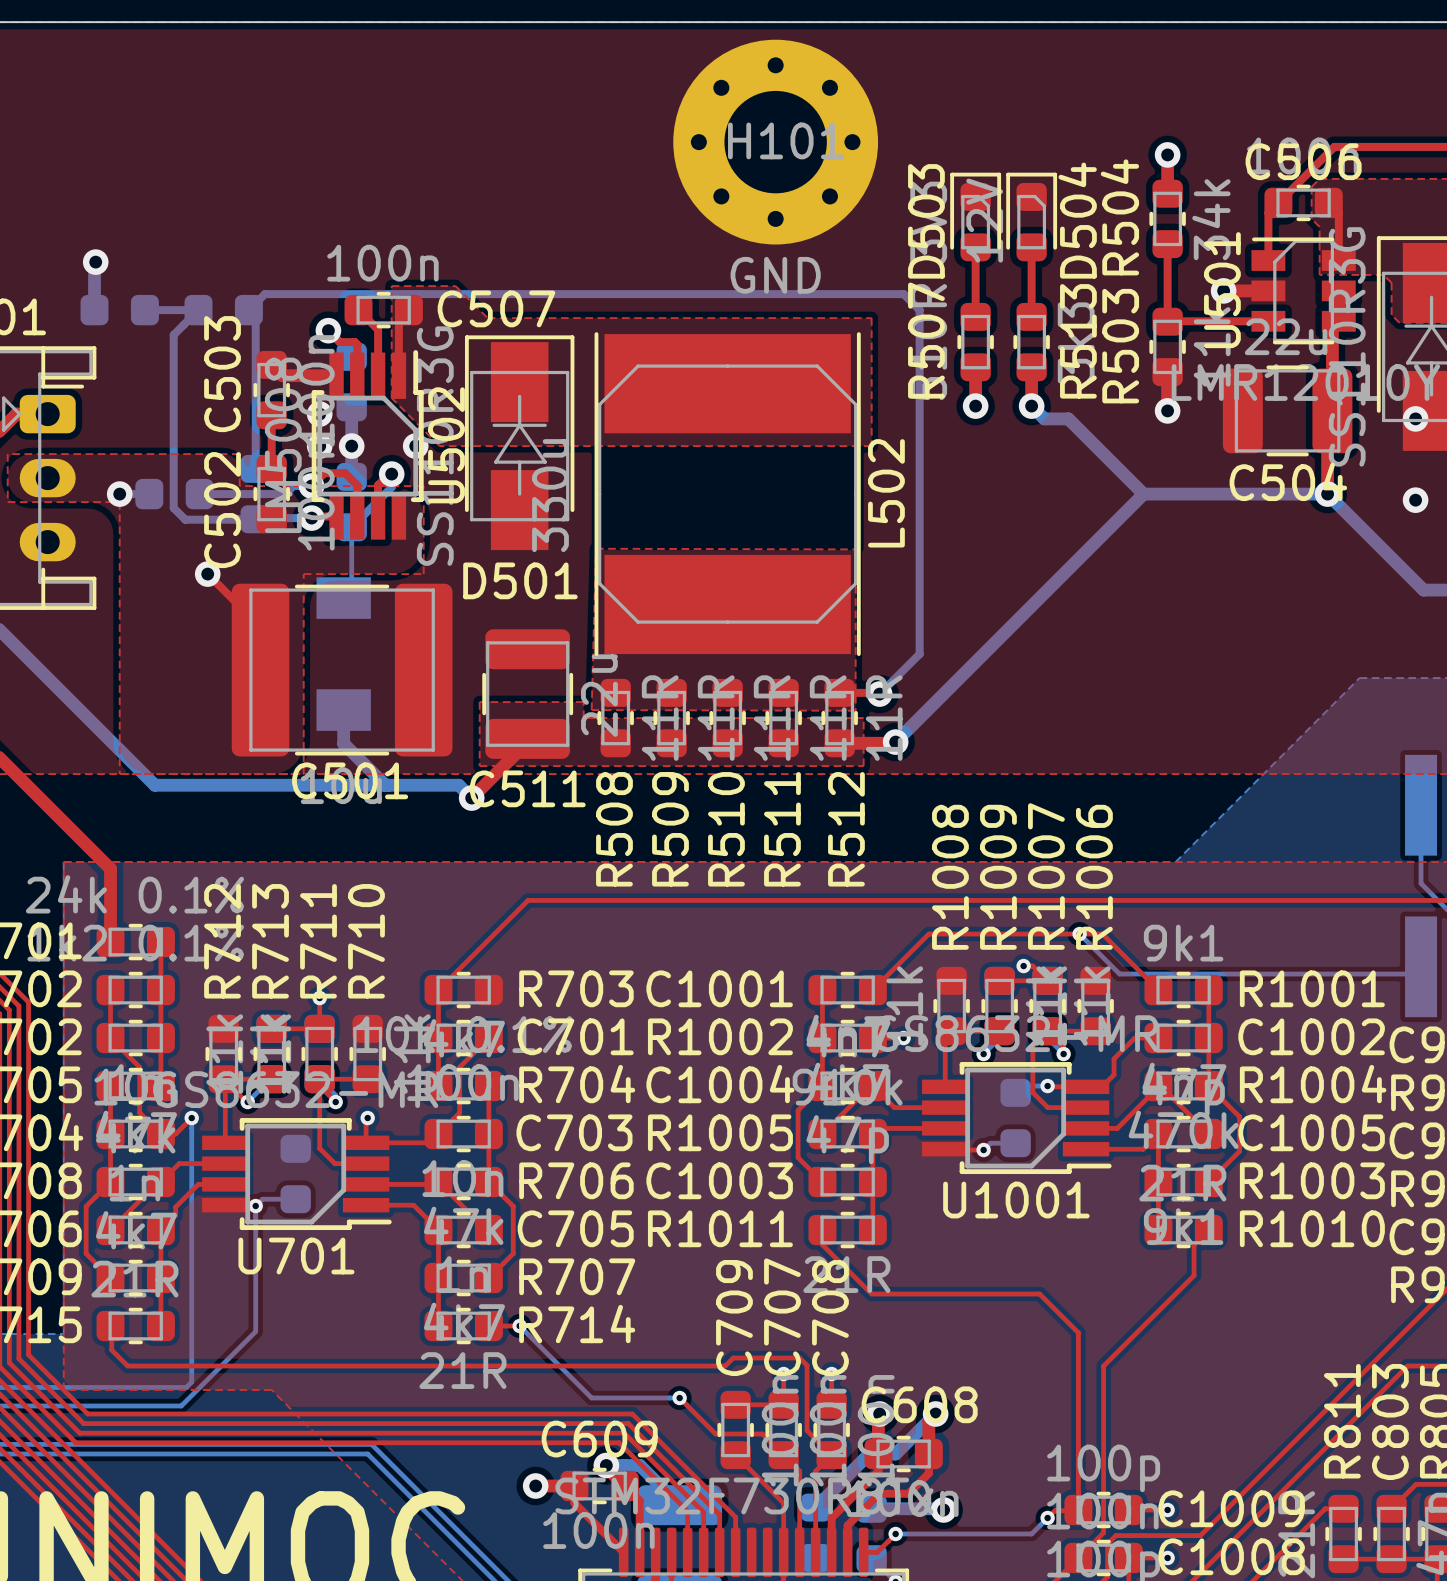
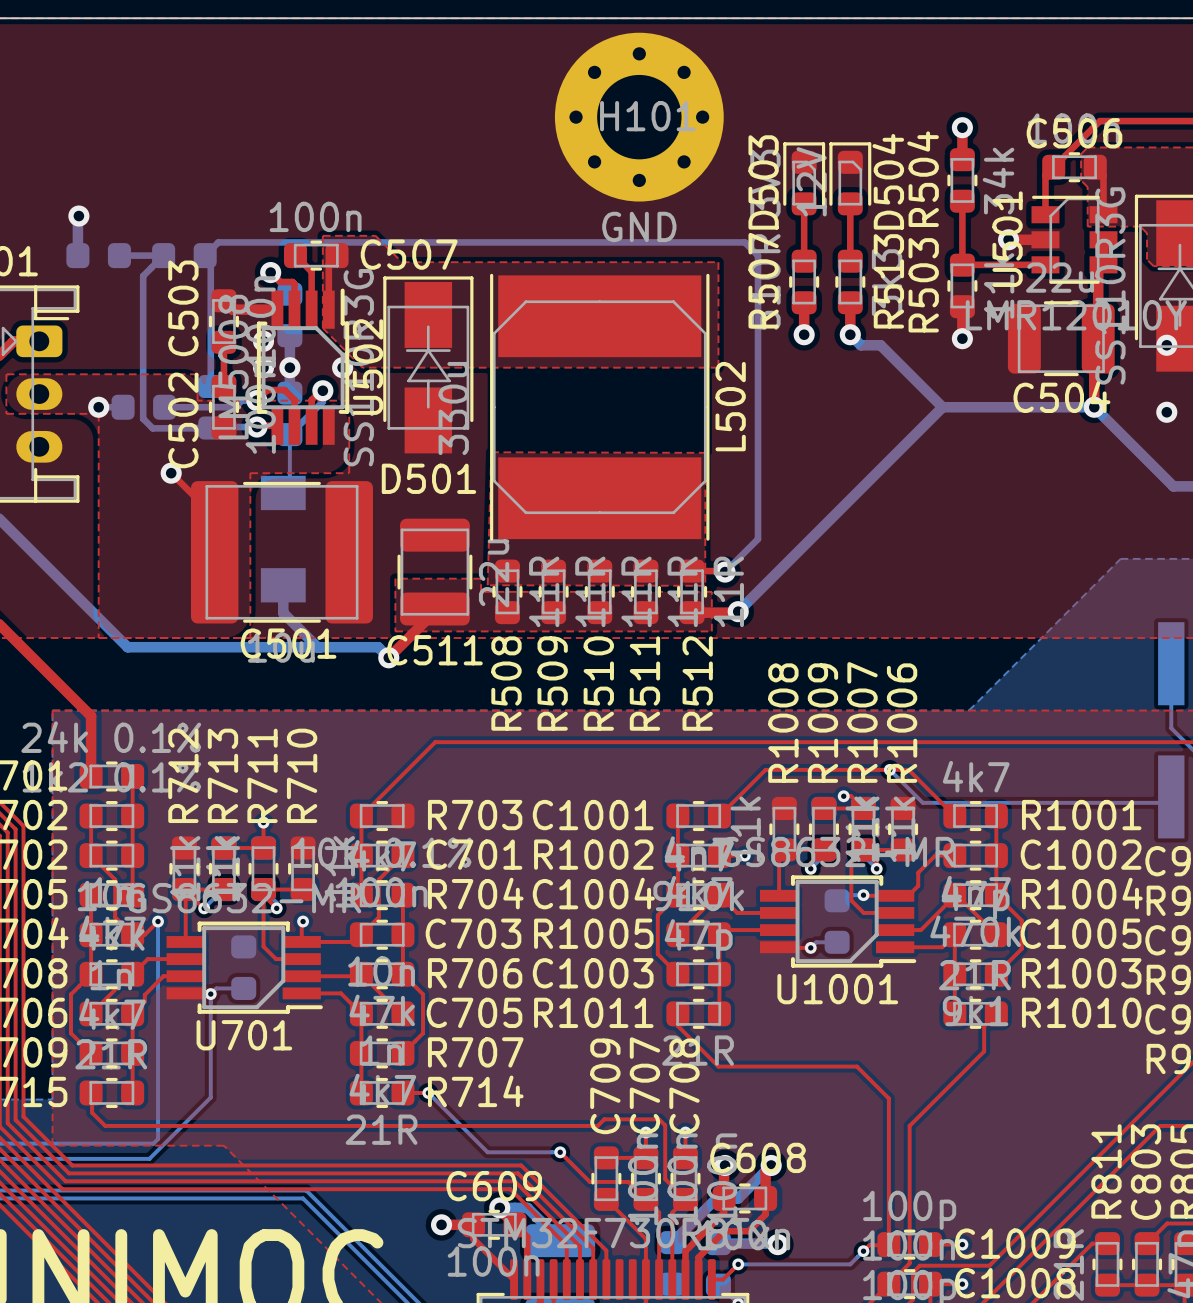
R1001 value: 9k1 (1183, 943) -> 4k7 (976, 776)

